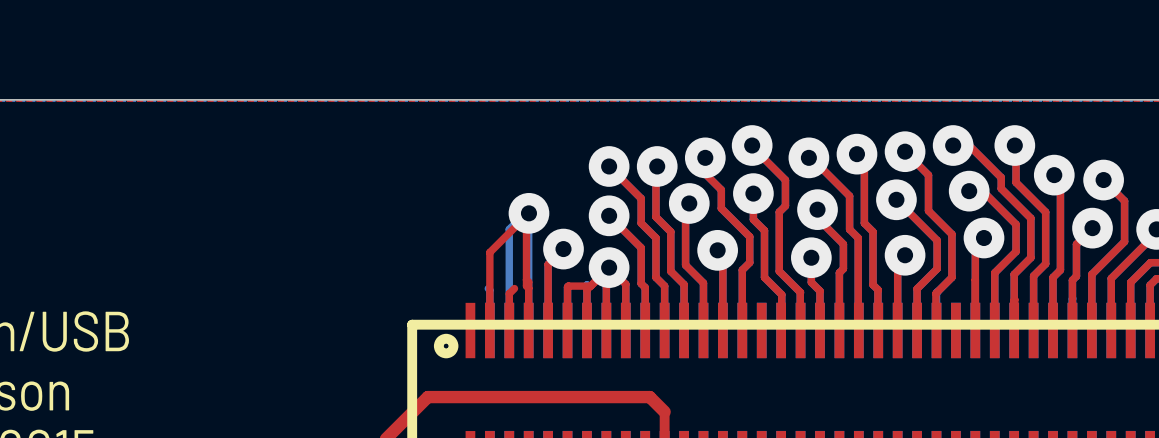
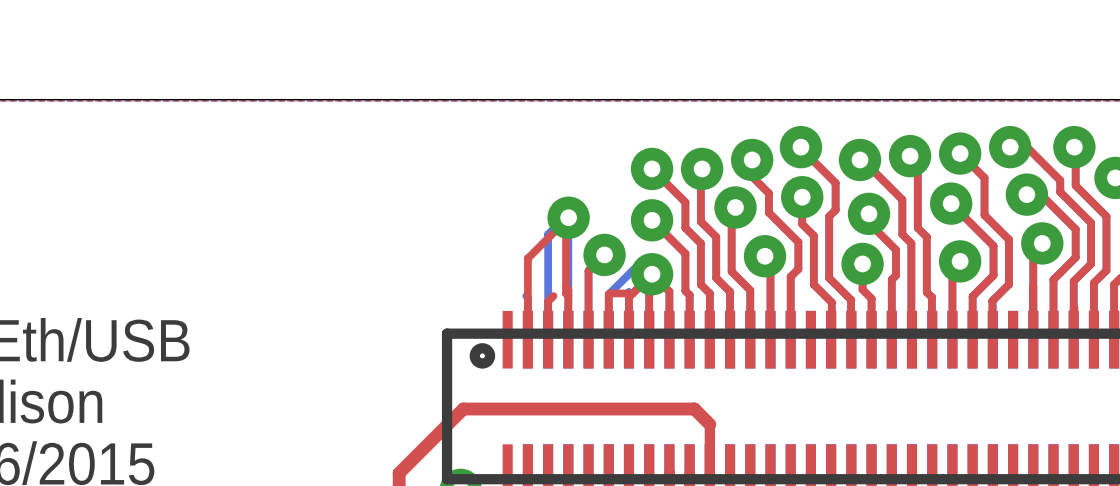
bottom track: none -> (641, 261) (609, 293)

